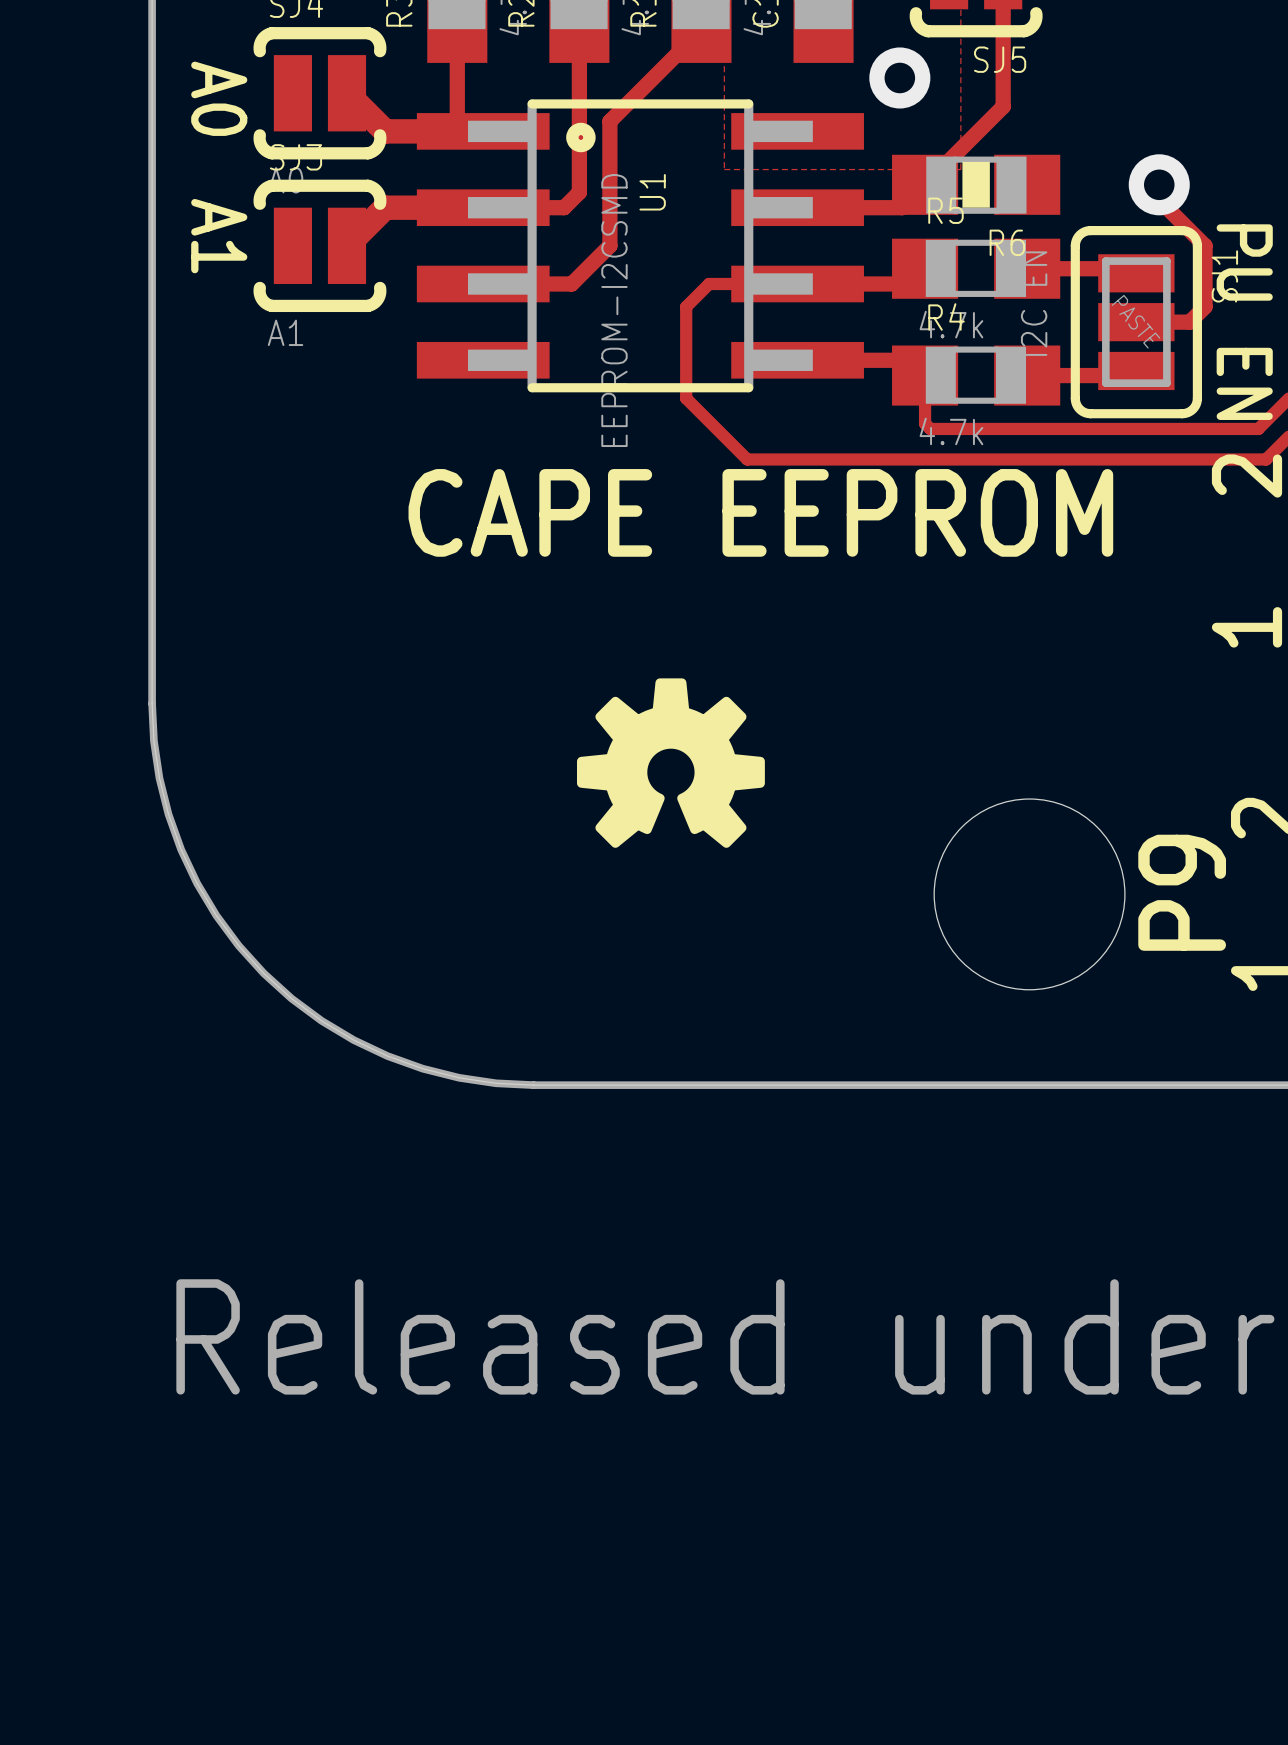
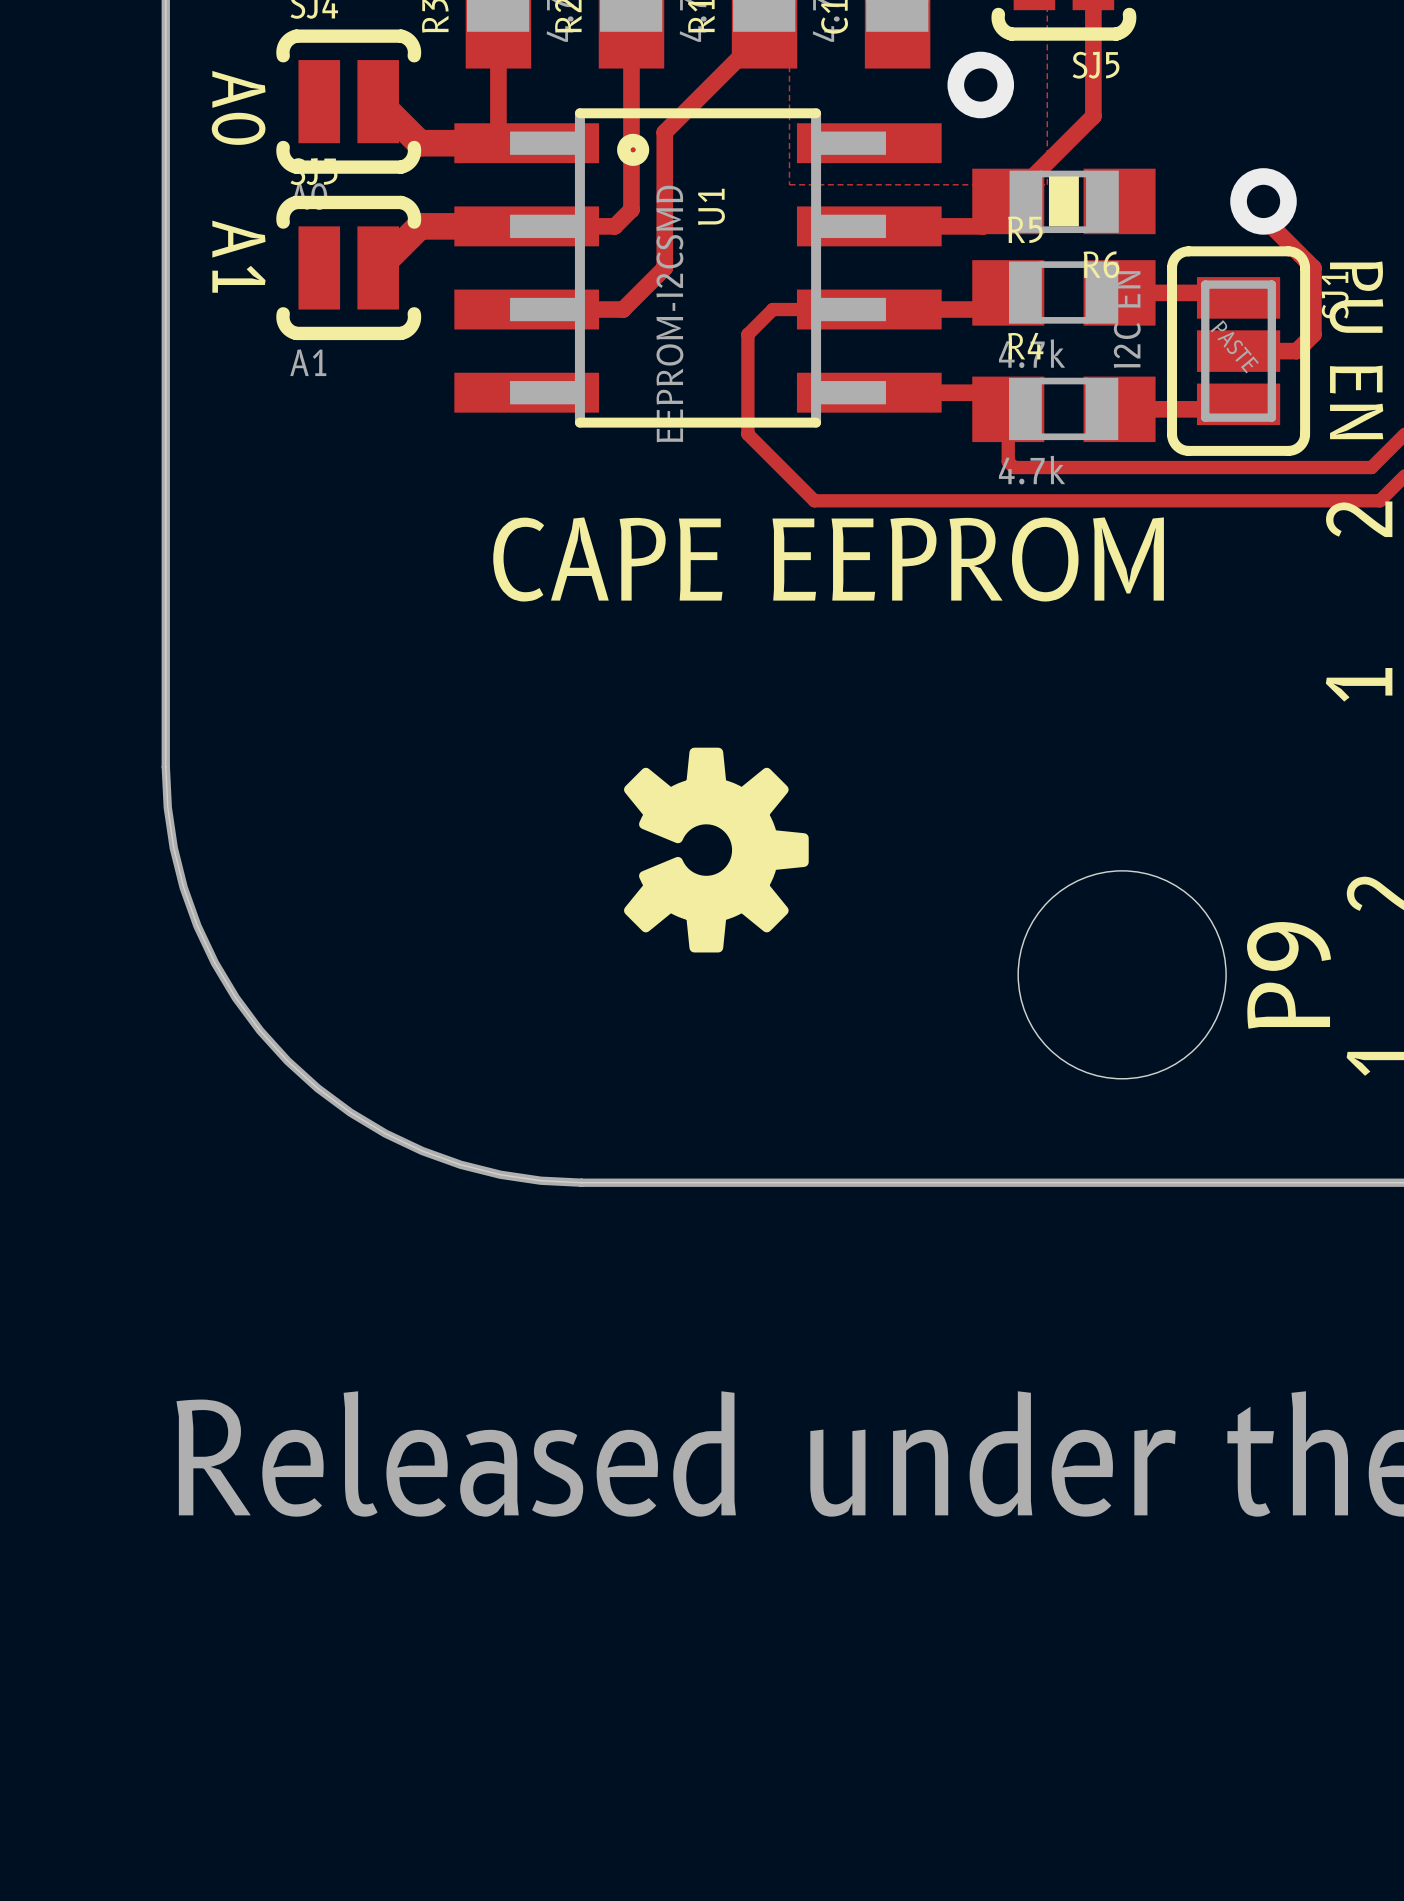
drawing shape: [576, 678, 765, 848] -> [624, 747, 809, 953]

